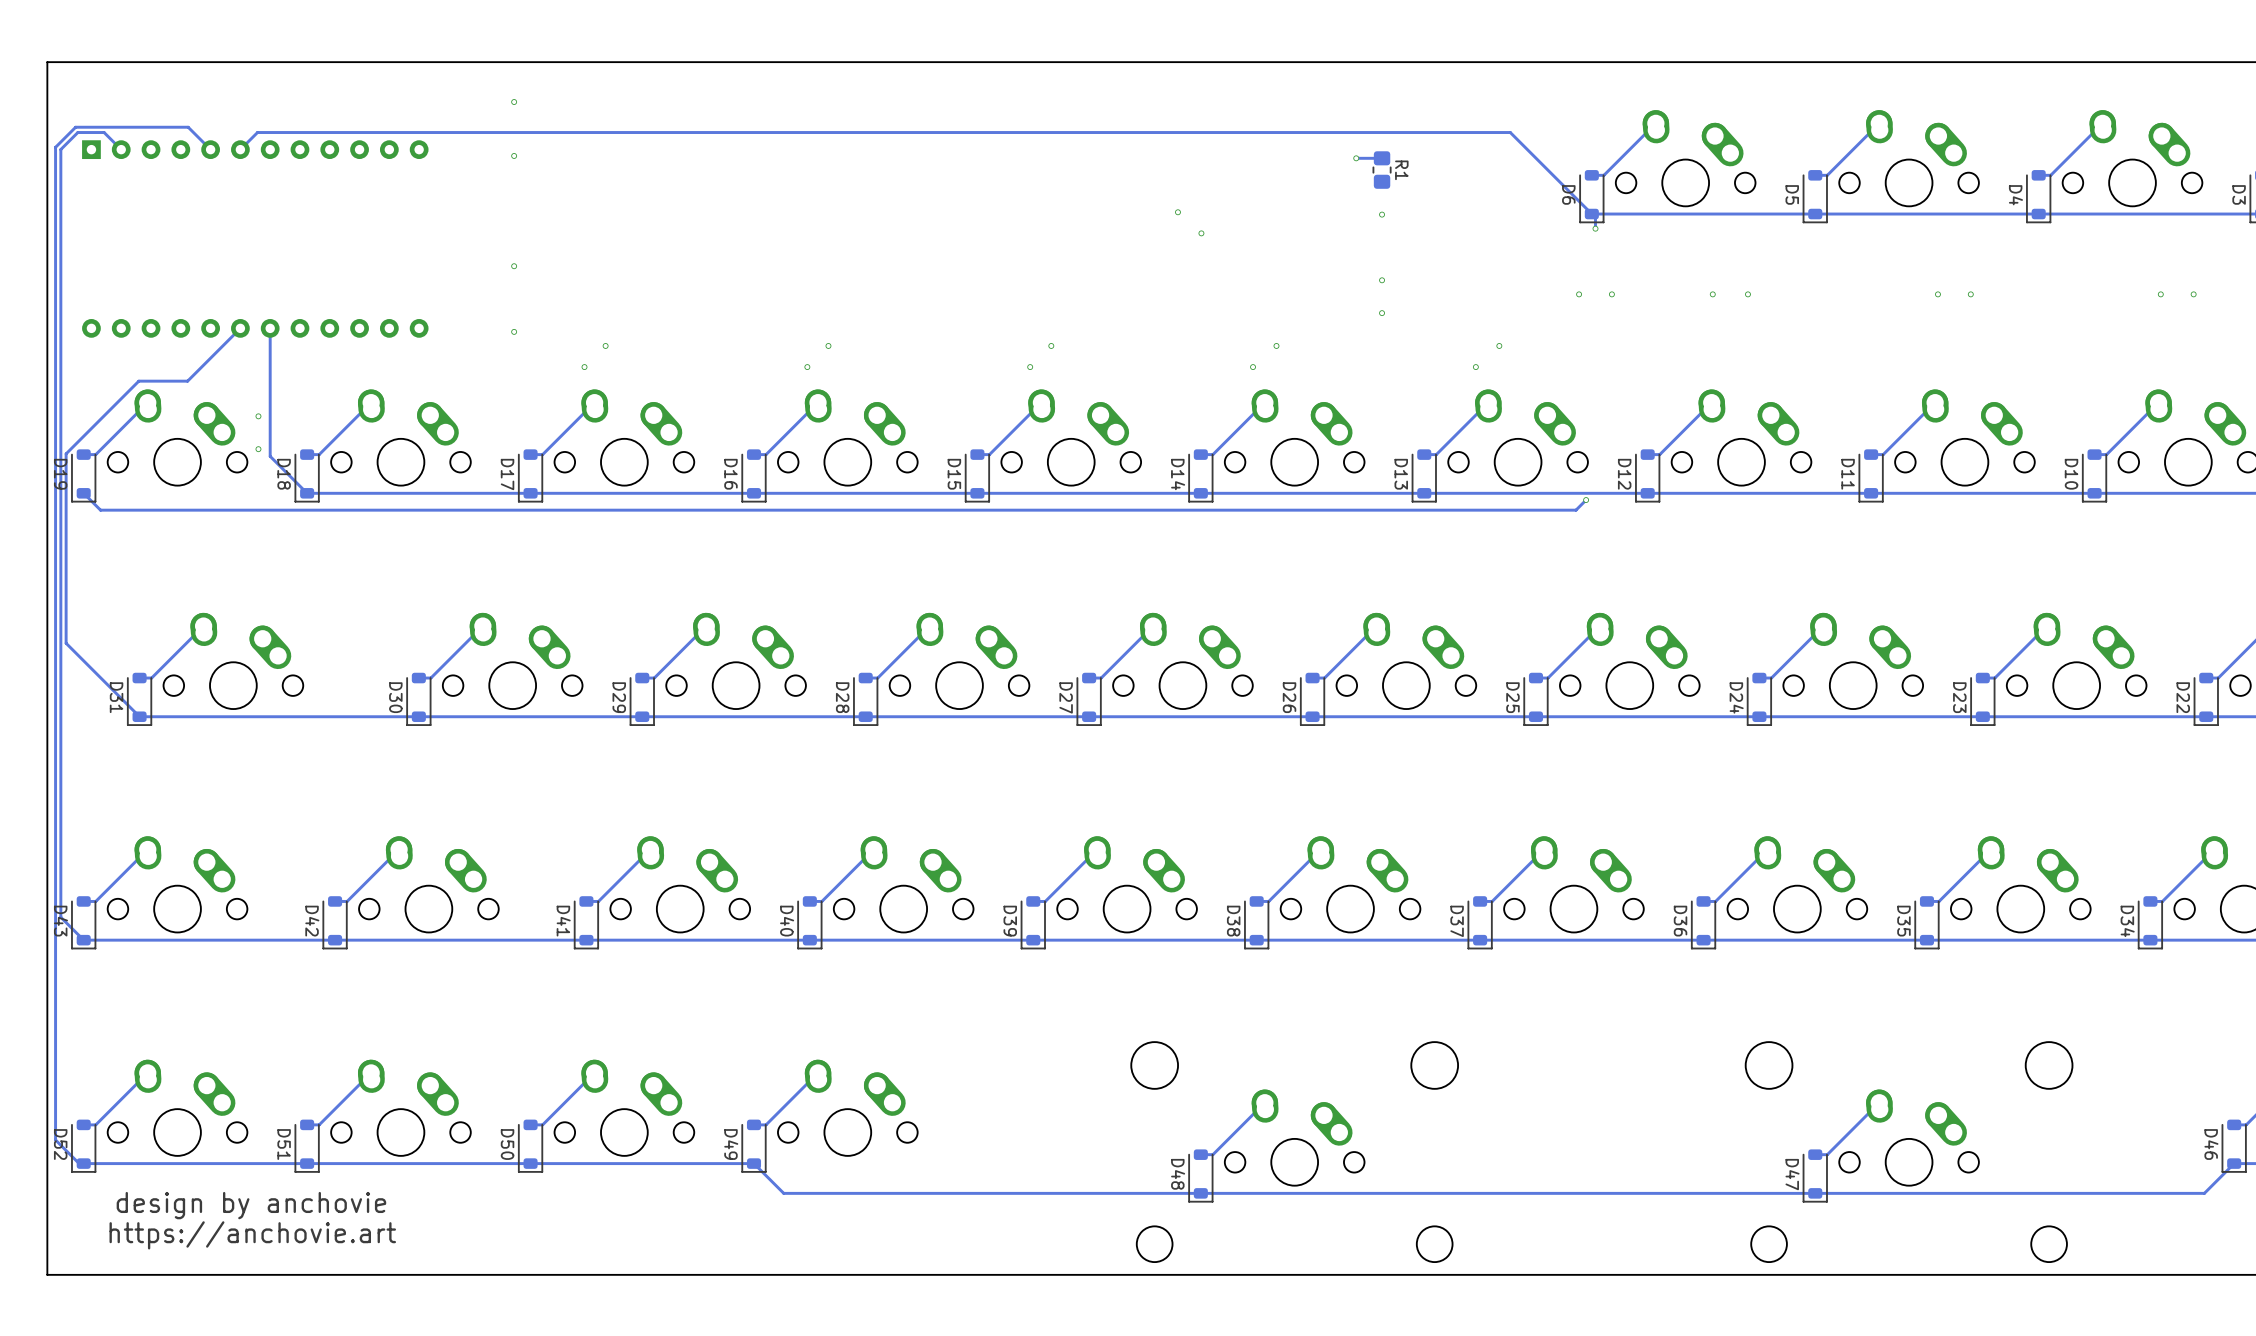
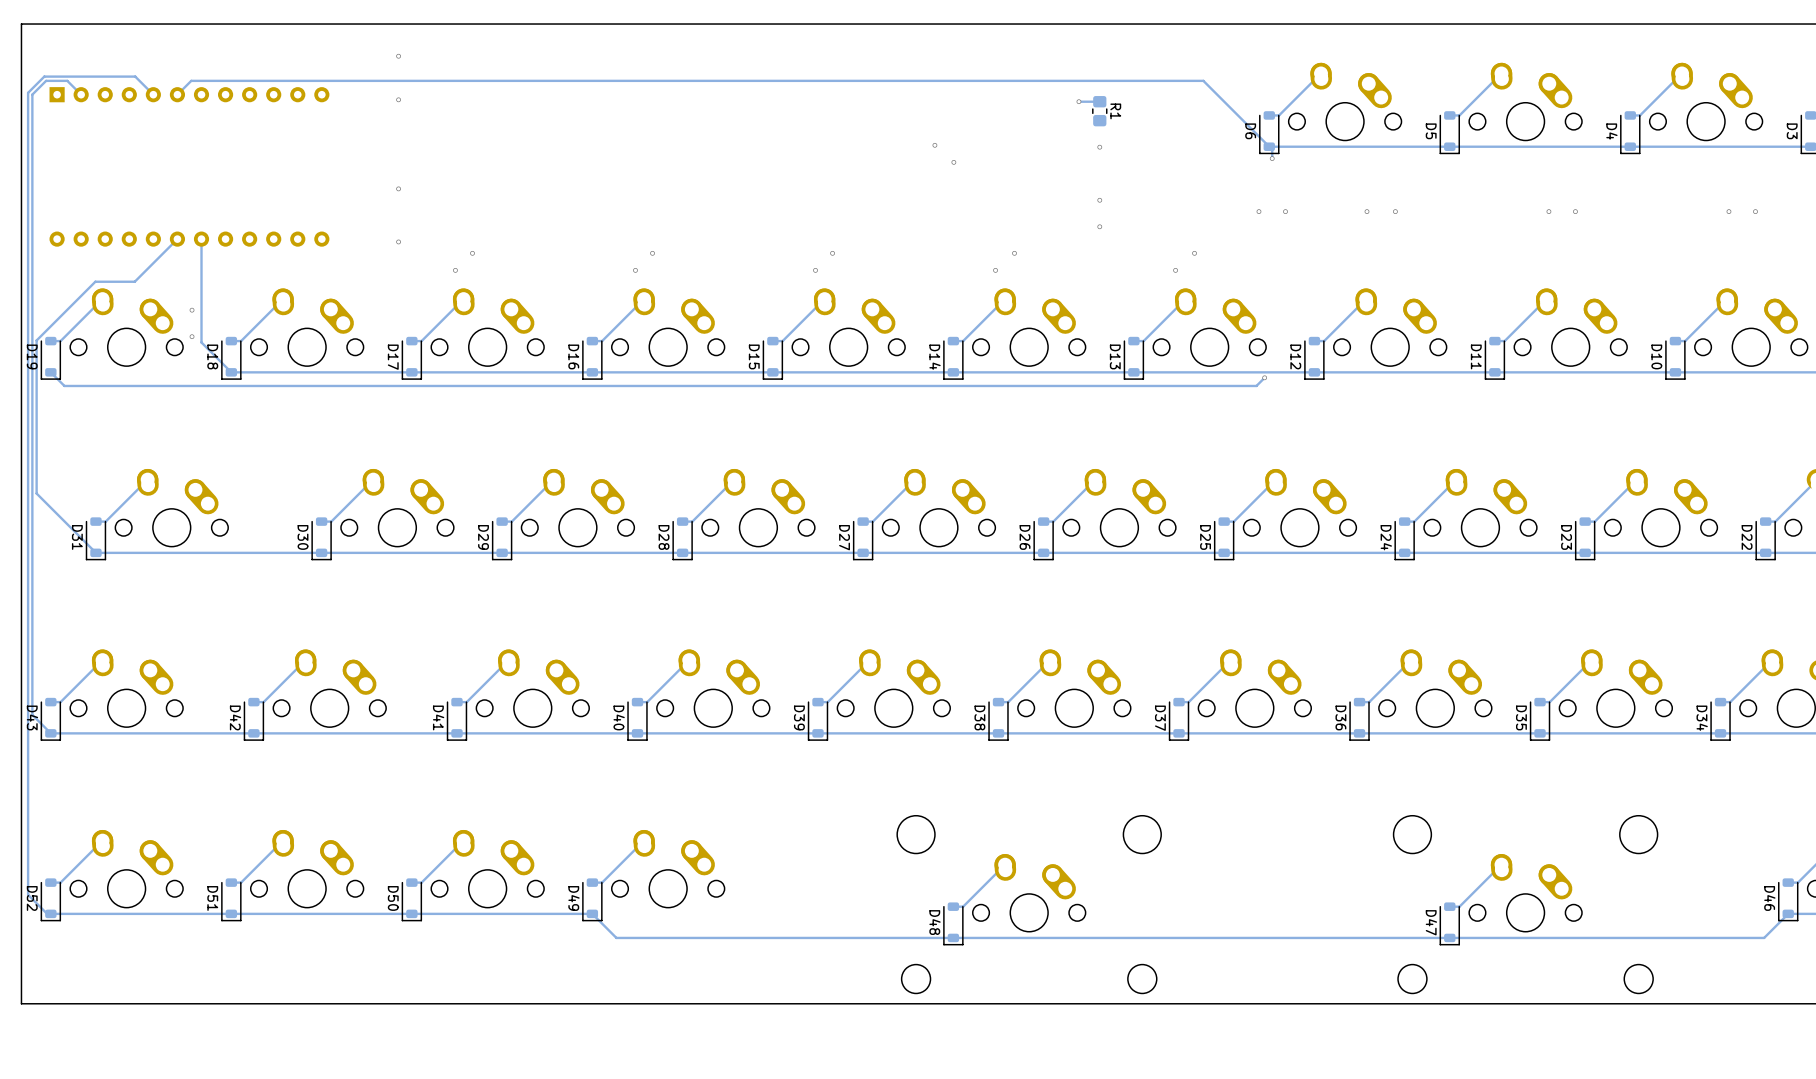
text: design by anchovie (251, 1205) -> none
text: https://anchovie.art (252, 1235) -> none

